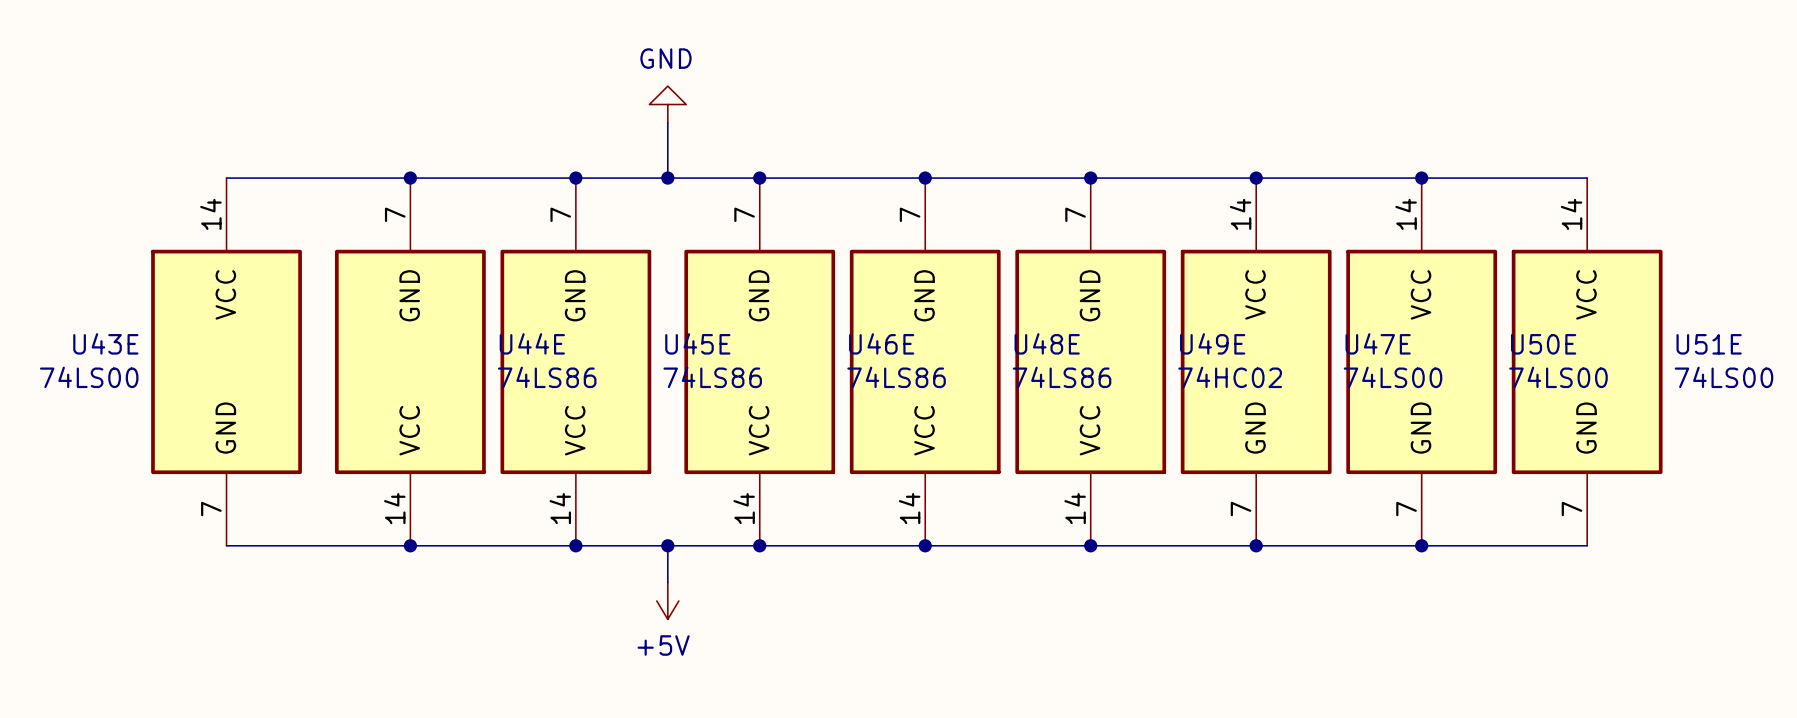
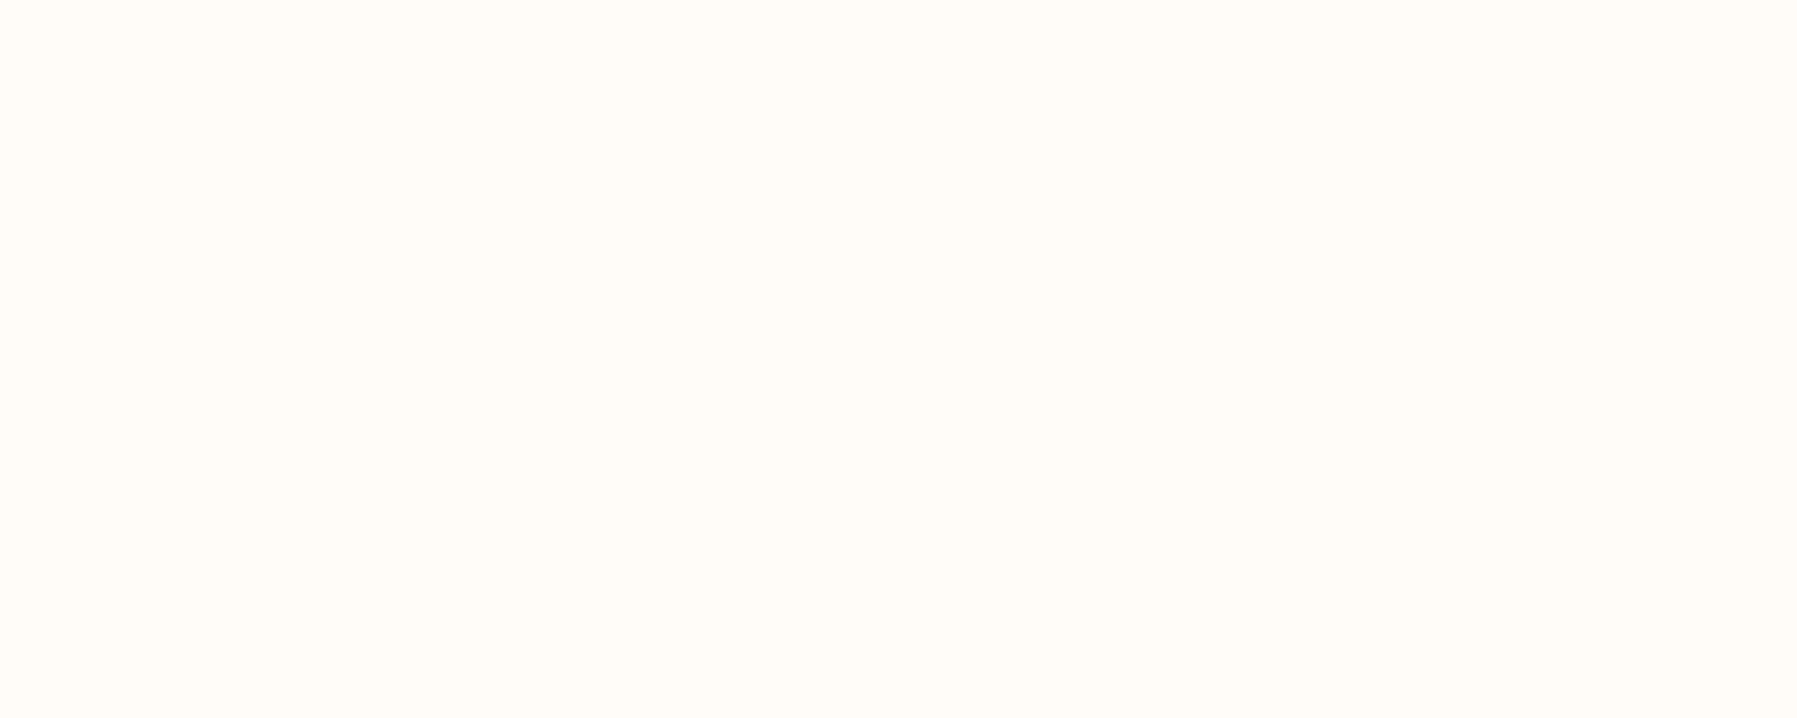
power symbol: GND (667, 104) -> none
wire: (667, 122) (667, 178) -> none
wire: (226, 178) (1587, 178) -> none
junction: (410, 178) -> none
junction: (575, 178) -> none
junction: (667, 178) -> none
junction: (759, 178) -> none
junction: (925, 178) -> none
junction: (1090, 178) -> none
junction: (1256, 178) -> none
junction: (1421, 178) -> none
U43E: 74LS00 (226, 361) -> none
U44E: 74LS86 (410, 361) -> none
U45E: 74LS86 (575, 361) -> none
U46E: 74LS86 (759, 361) -> none
U48E: 74LS86 (925, 361) -> none
U49E: 74HC02 (1090, 361) -> none
U47E: 74LS00 (1256, 361) -> none
U50E: 74LS00 (1421, 361) -> none
U51E: 74LS00 (1587, 361) -> none
wire: (226, 545) (1587, 545) -> none
junction: (410, 545) -> none
junction: (575, 545) -> none
wire: (667, 545) (667, 582) -> none
junction: (667, 545) -> none
junction: (759, 545) -> none
junction: (925, 545) -> none
junction: (1090, 545) -> none
junction: (1256, 545) -> none
junction: (1421, 545) -> none
power symbol: +5V (667, 600) -> none

